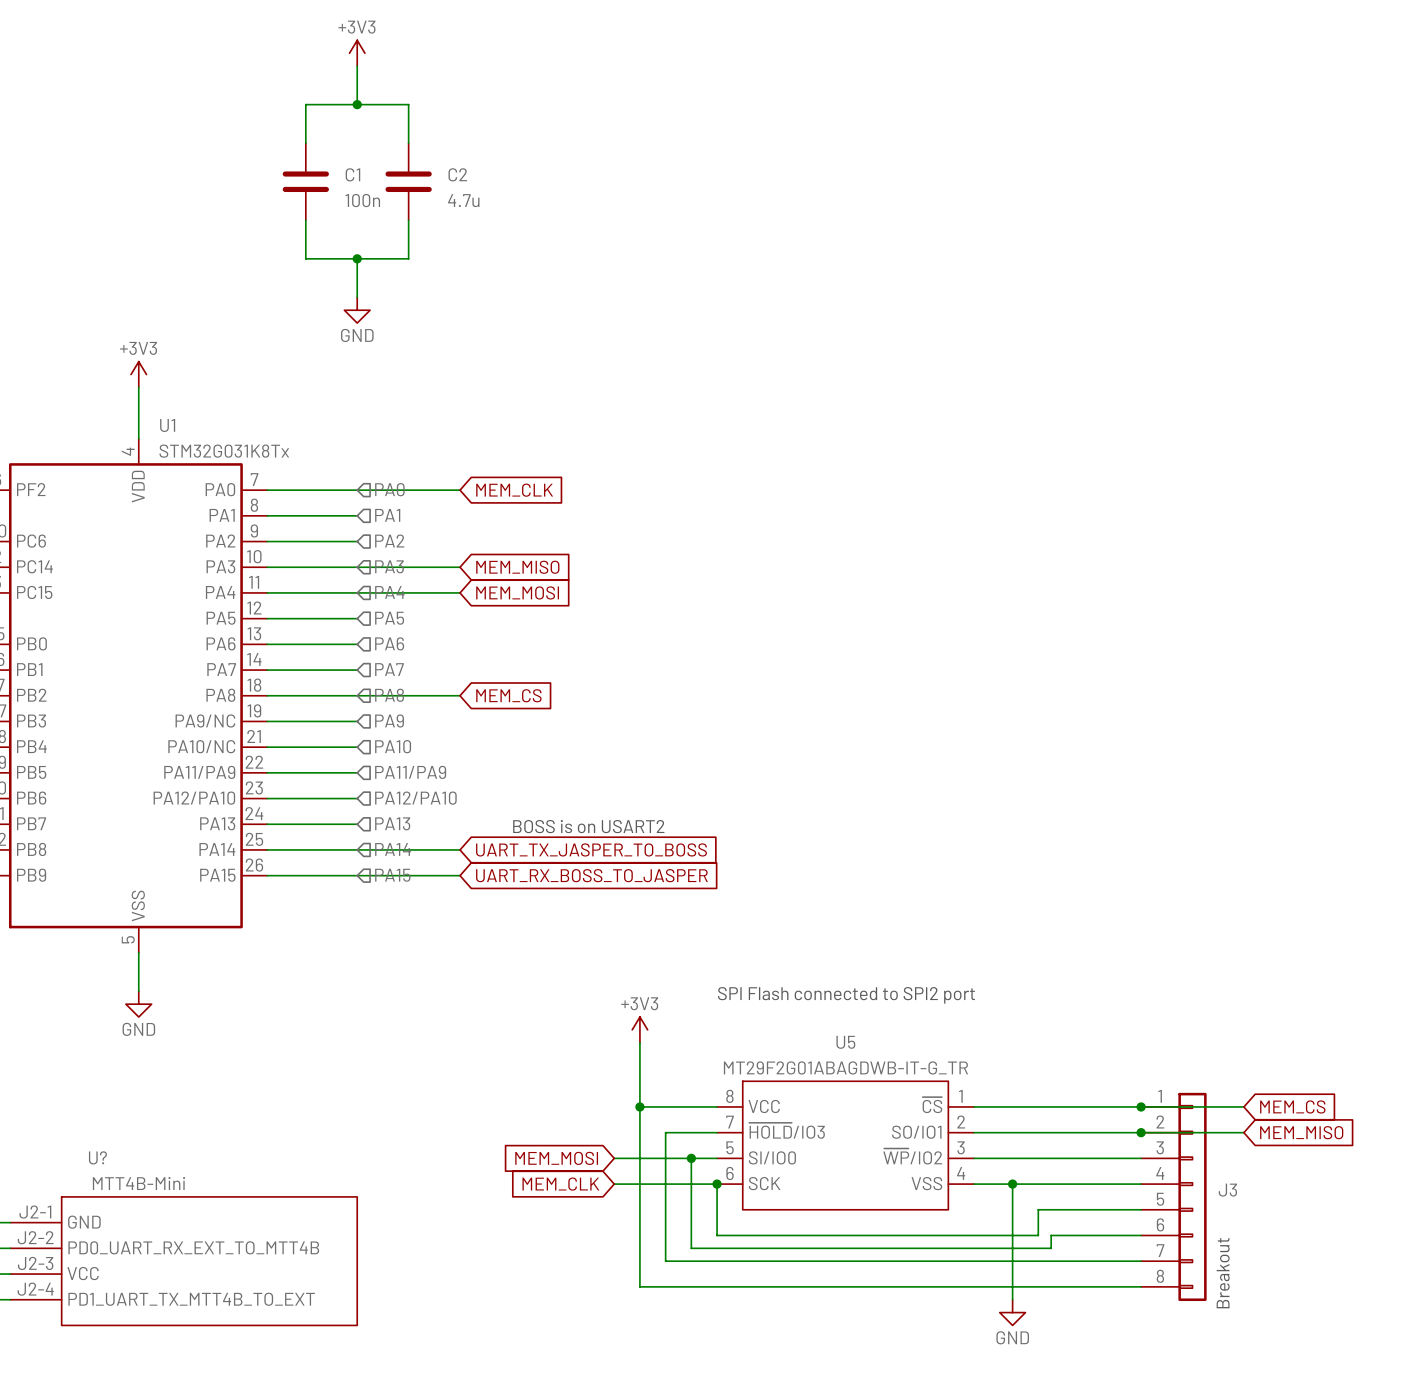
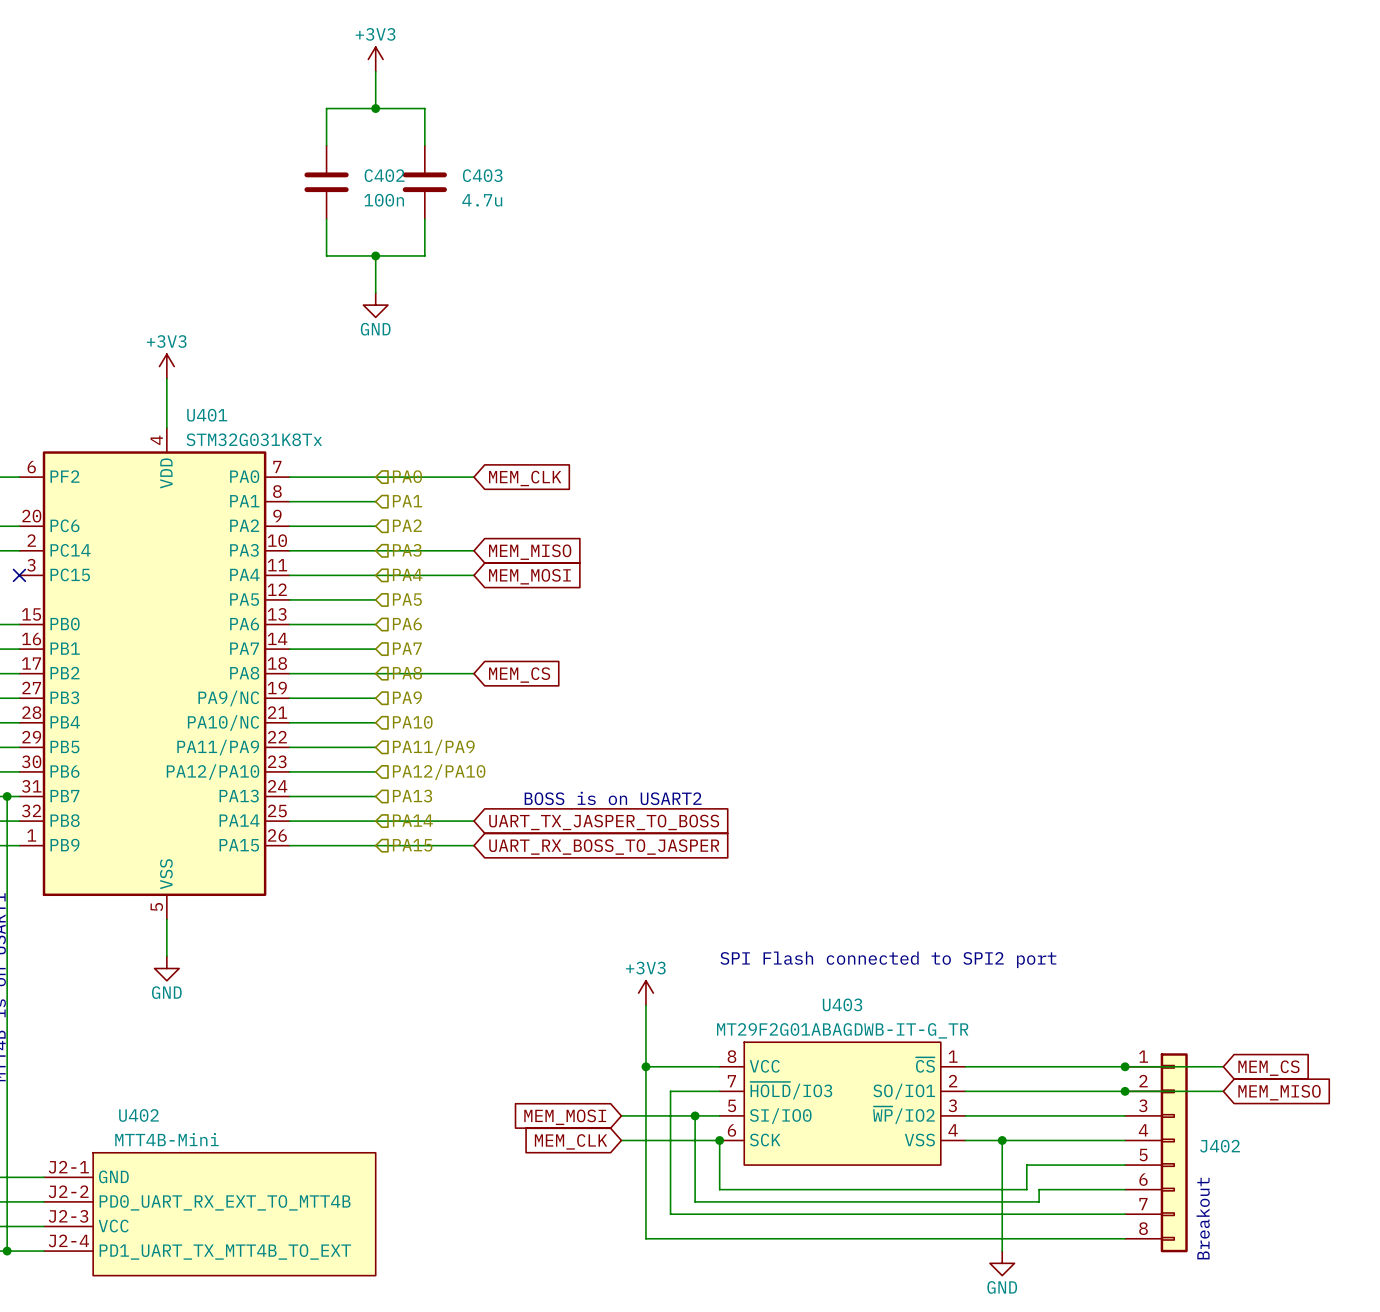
C1 name: C1 (352, 174) -> C402 (384, 175)
C2 name: C2 (457, 174) -> C403 (482, 175)
U1 name: U1 (167, 425) -> U401 (207, 415)
U5 name: U5 (845, 1042) -> U403 (842, 1004)
U? name: U? (97, 1157) -> U402 (138, 1115)
J3 name: J3 (1227, 1190) -> J402 (1220, 1146)

